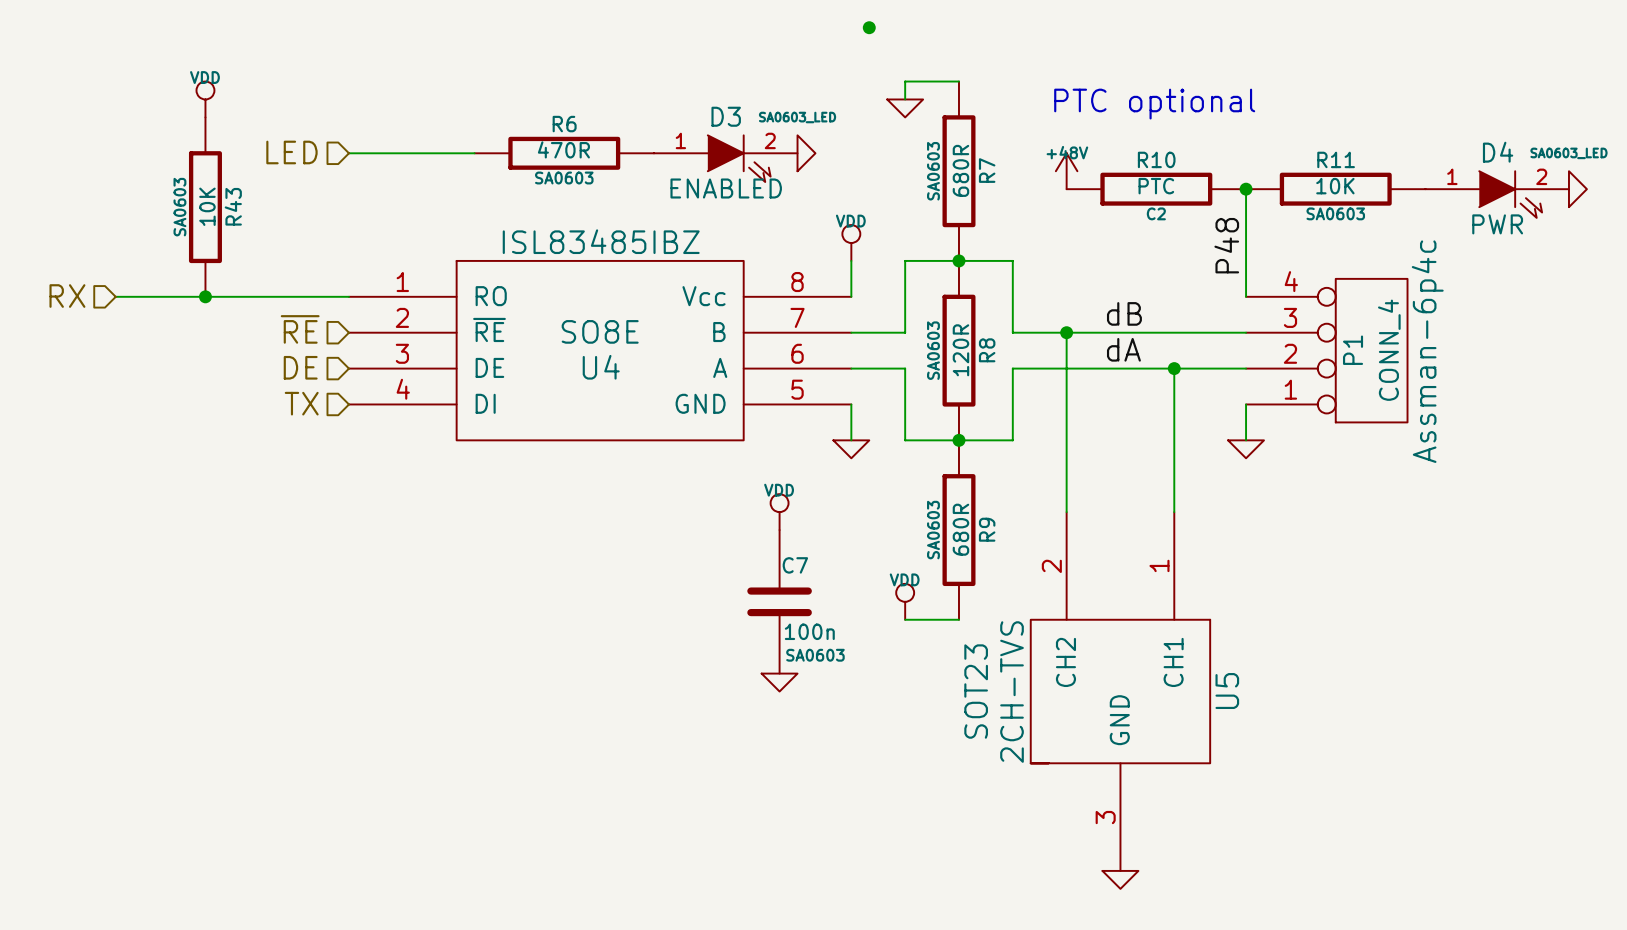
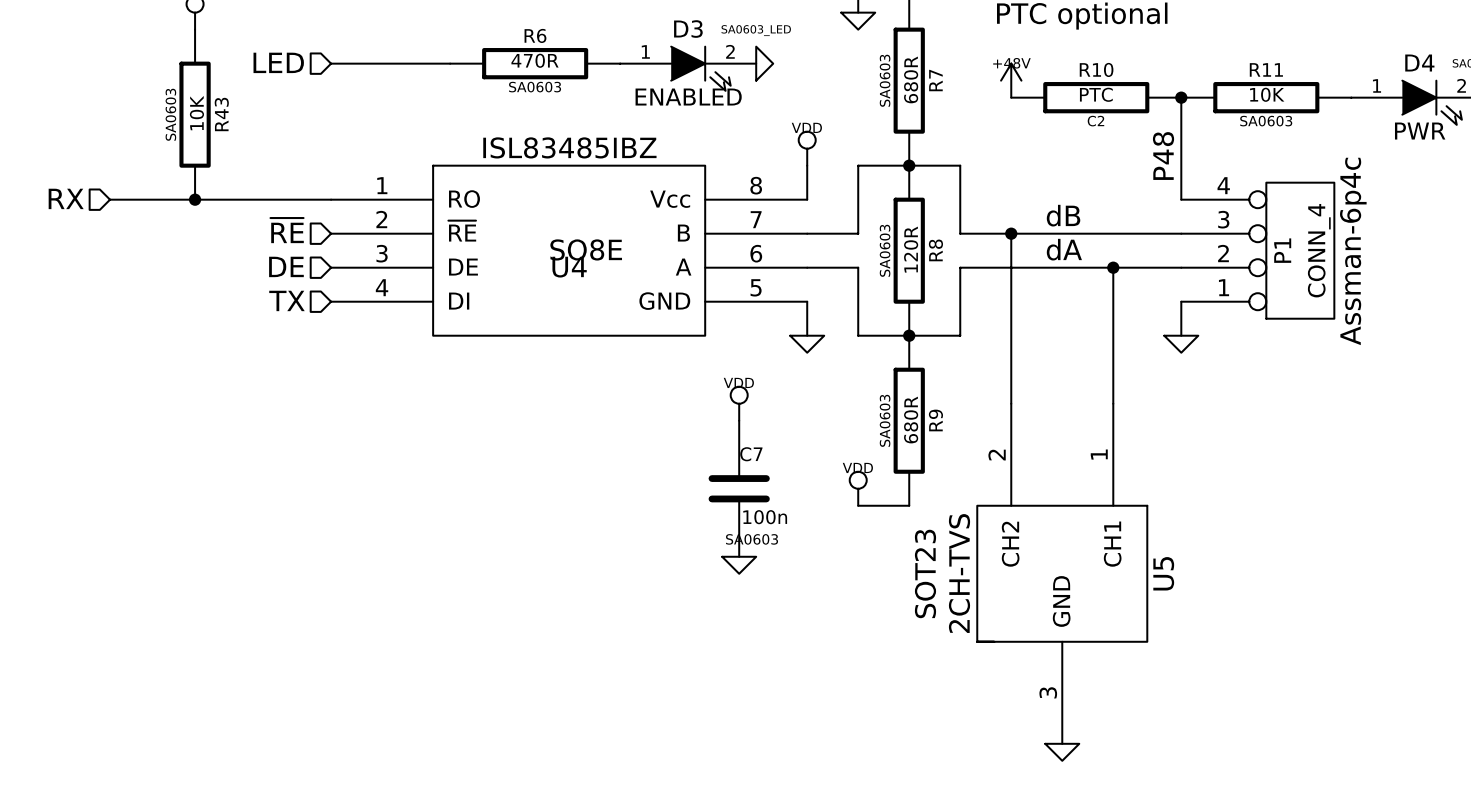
U4 text position: SO8E (600, 331) -> SO8E (586, 249)
C7 text position: SA0603 (815, 655) -> SA0603 (752, 539)

